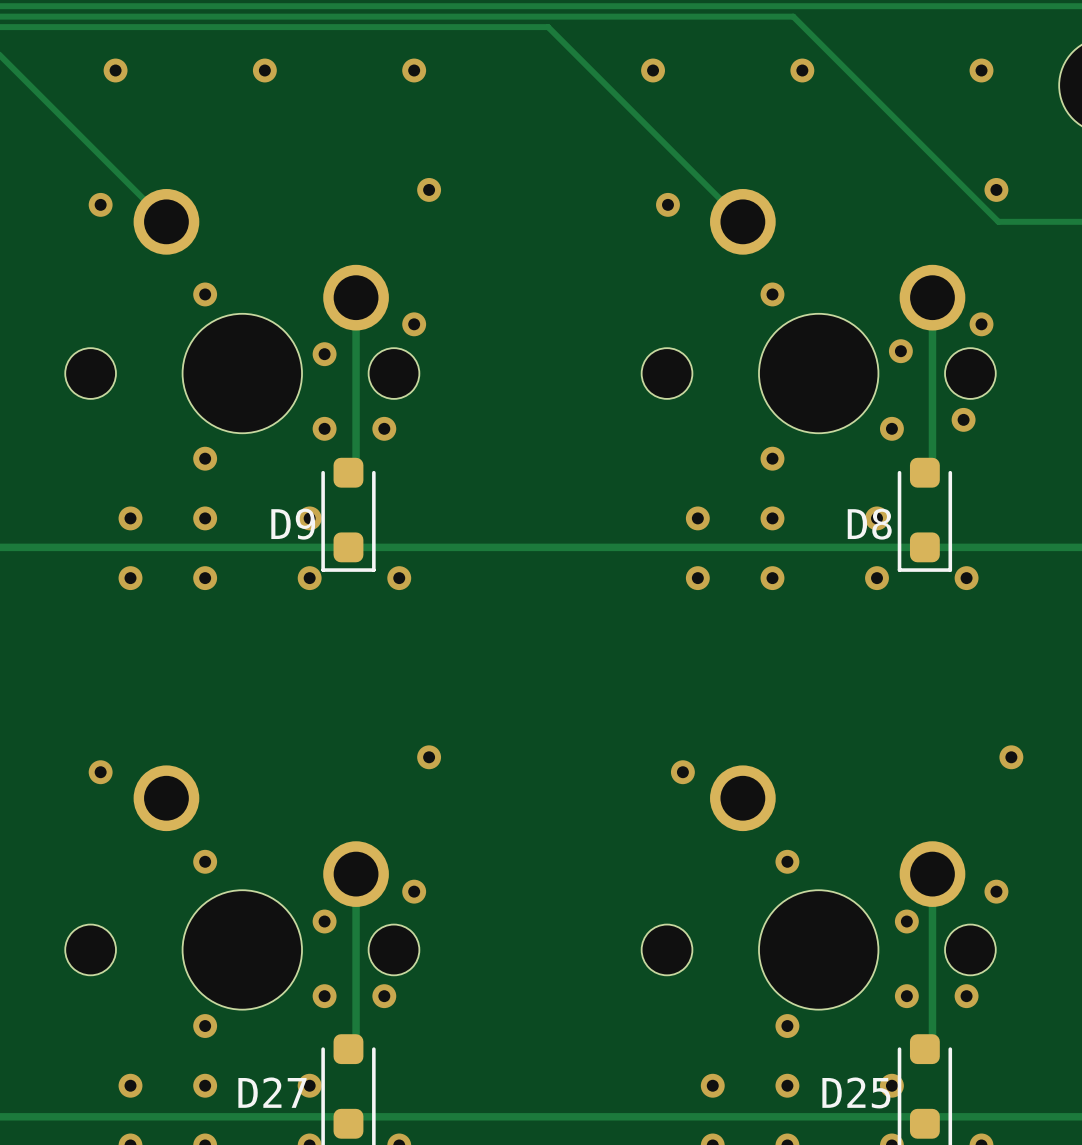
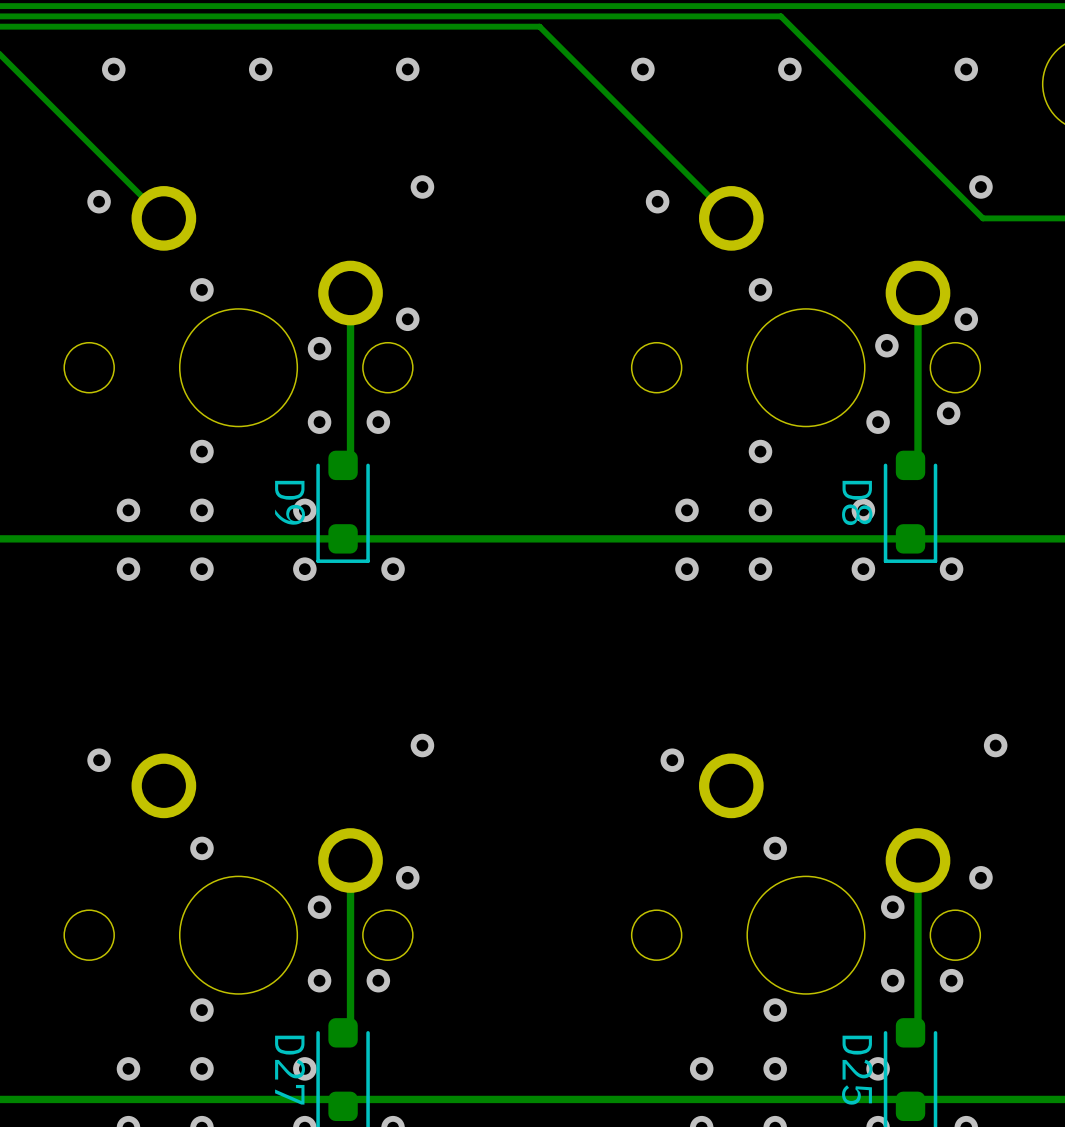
D9 name rotation: 0° (293, 524) -> 90° clockwise (290, 502)
D8 name rotation: 0° (869, 524) -> 90° clockwise (857, 502)
D27 name rotation: 0° (272, 1092) -> 90° clockwise (290, 1070)
D25 name rotation: 0° (856, 1092) -> 90° clockwise (857, 1070)

